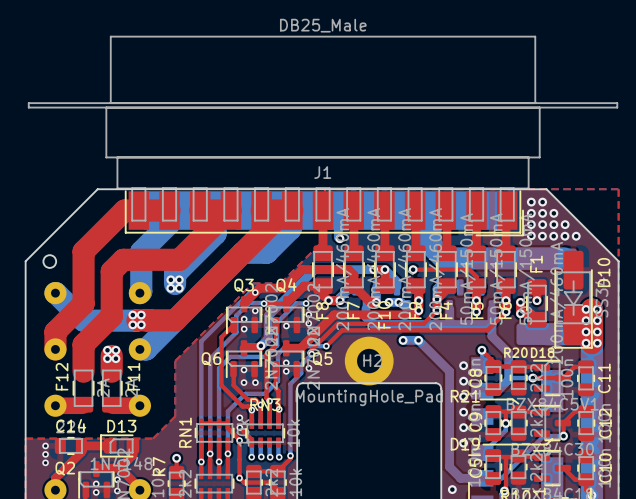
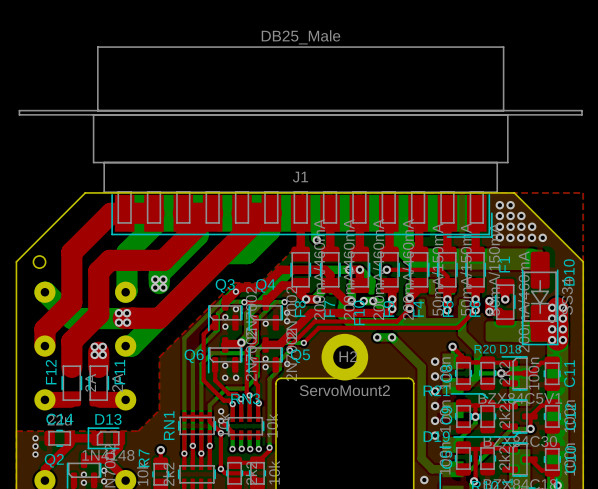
H2 value: MountingHole_Pad (369, 397) -> ServoMount2 (344, 390)

